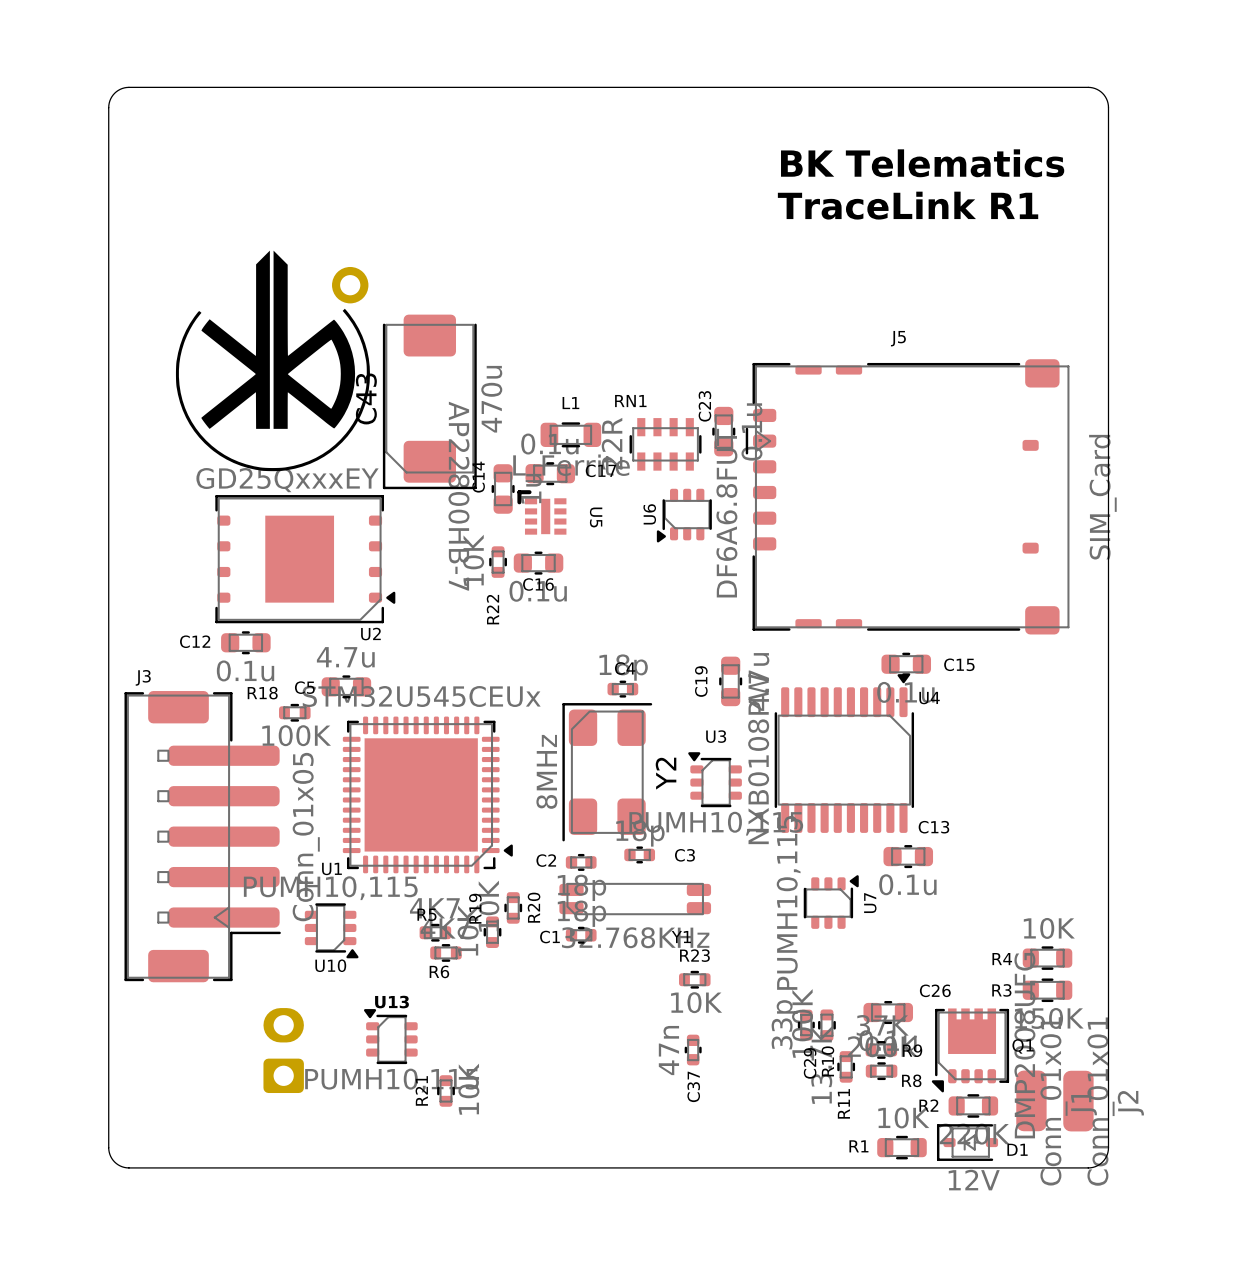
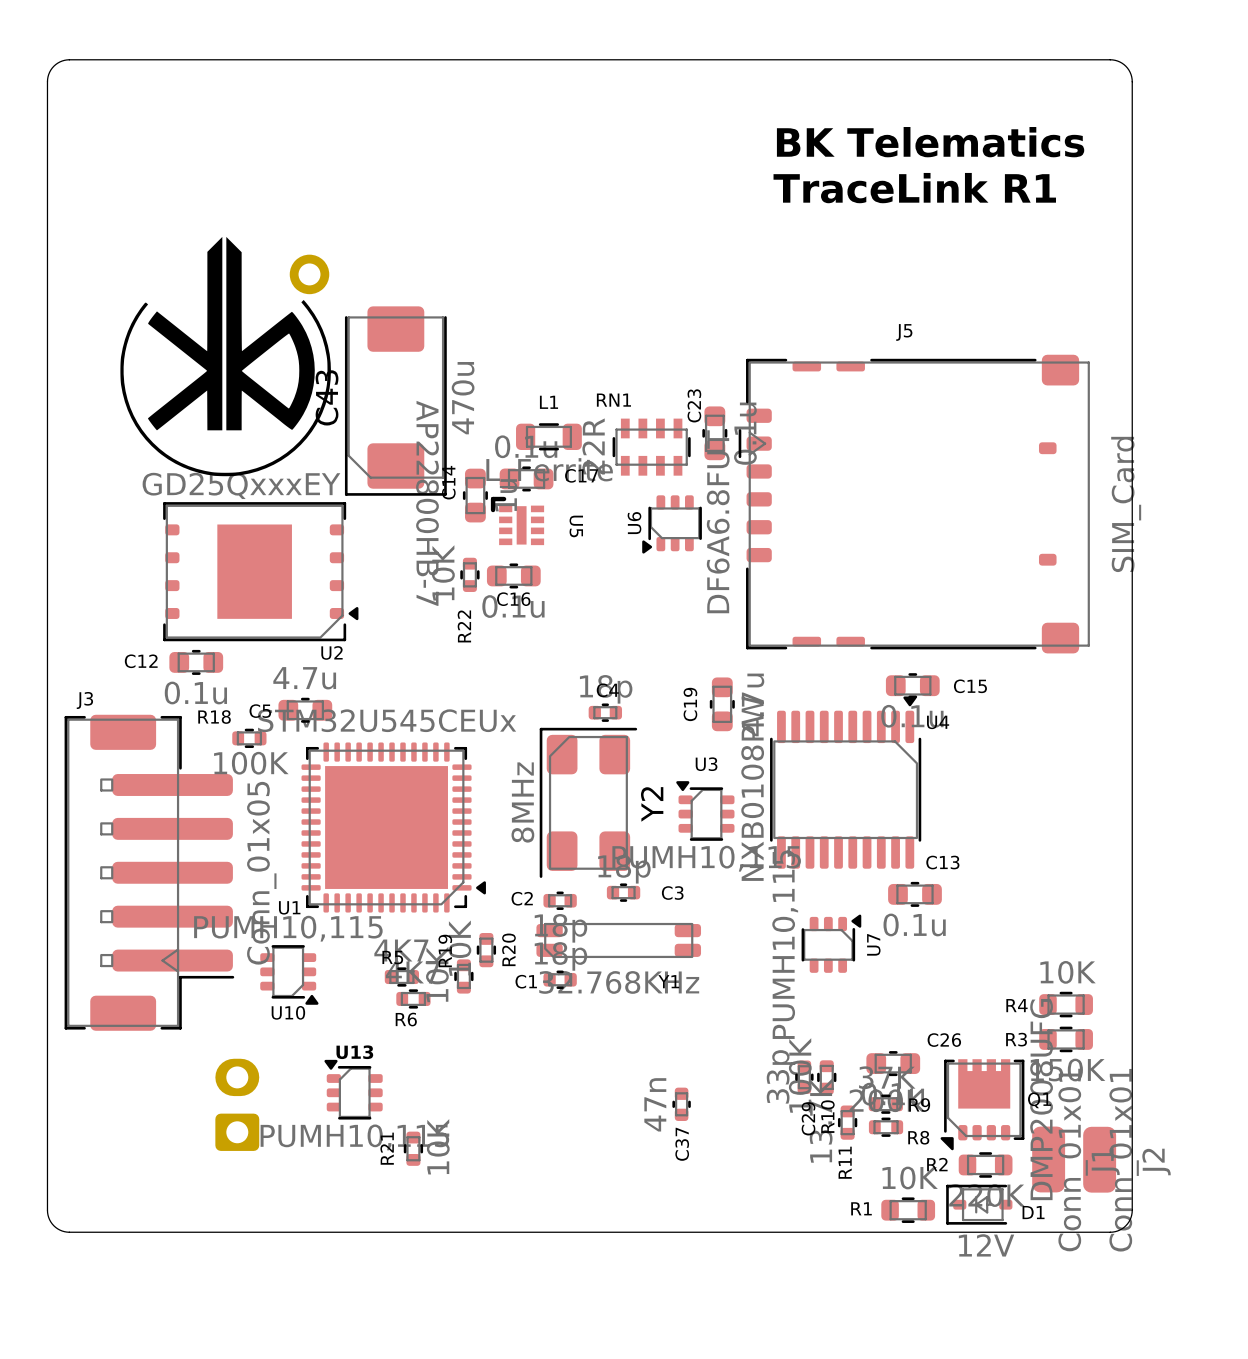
R23: 10K (694, 979) -> none

